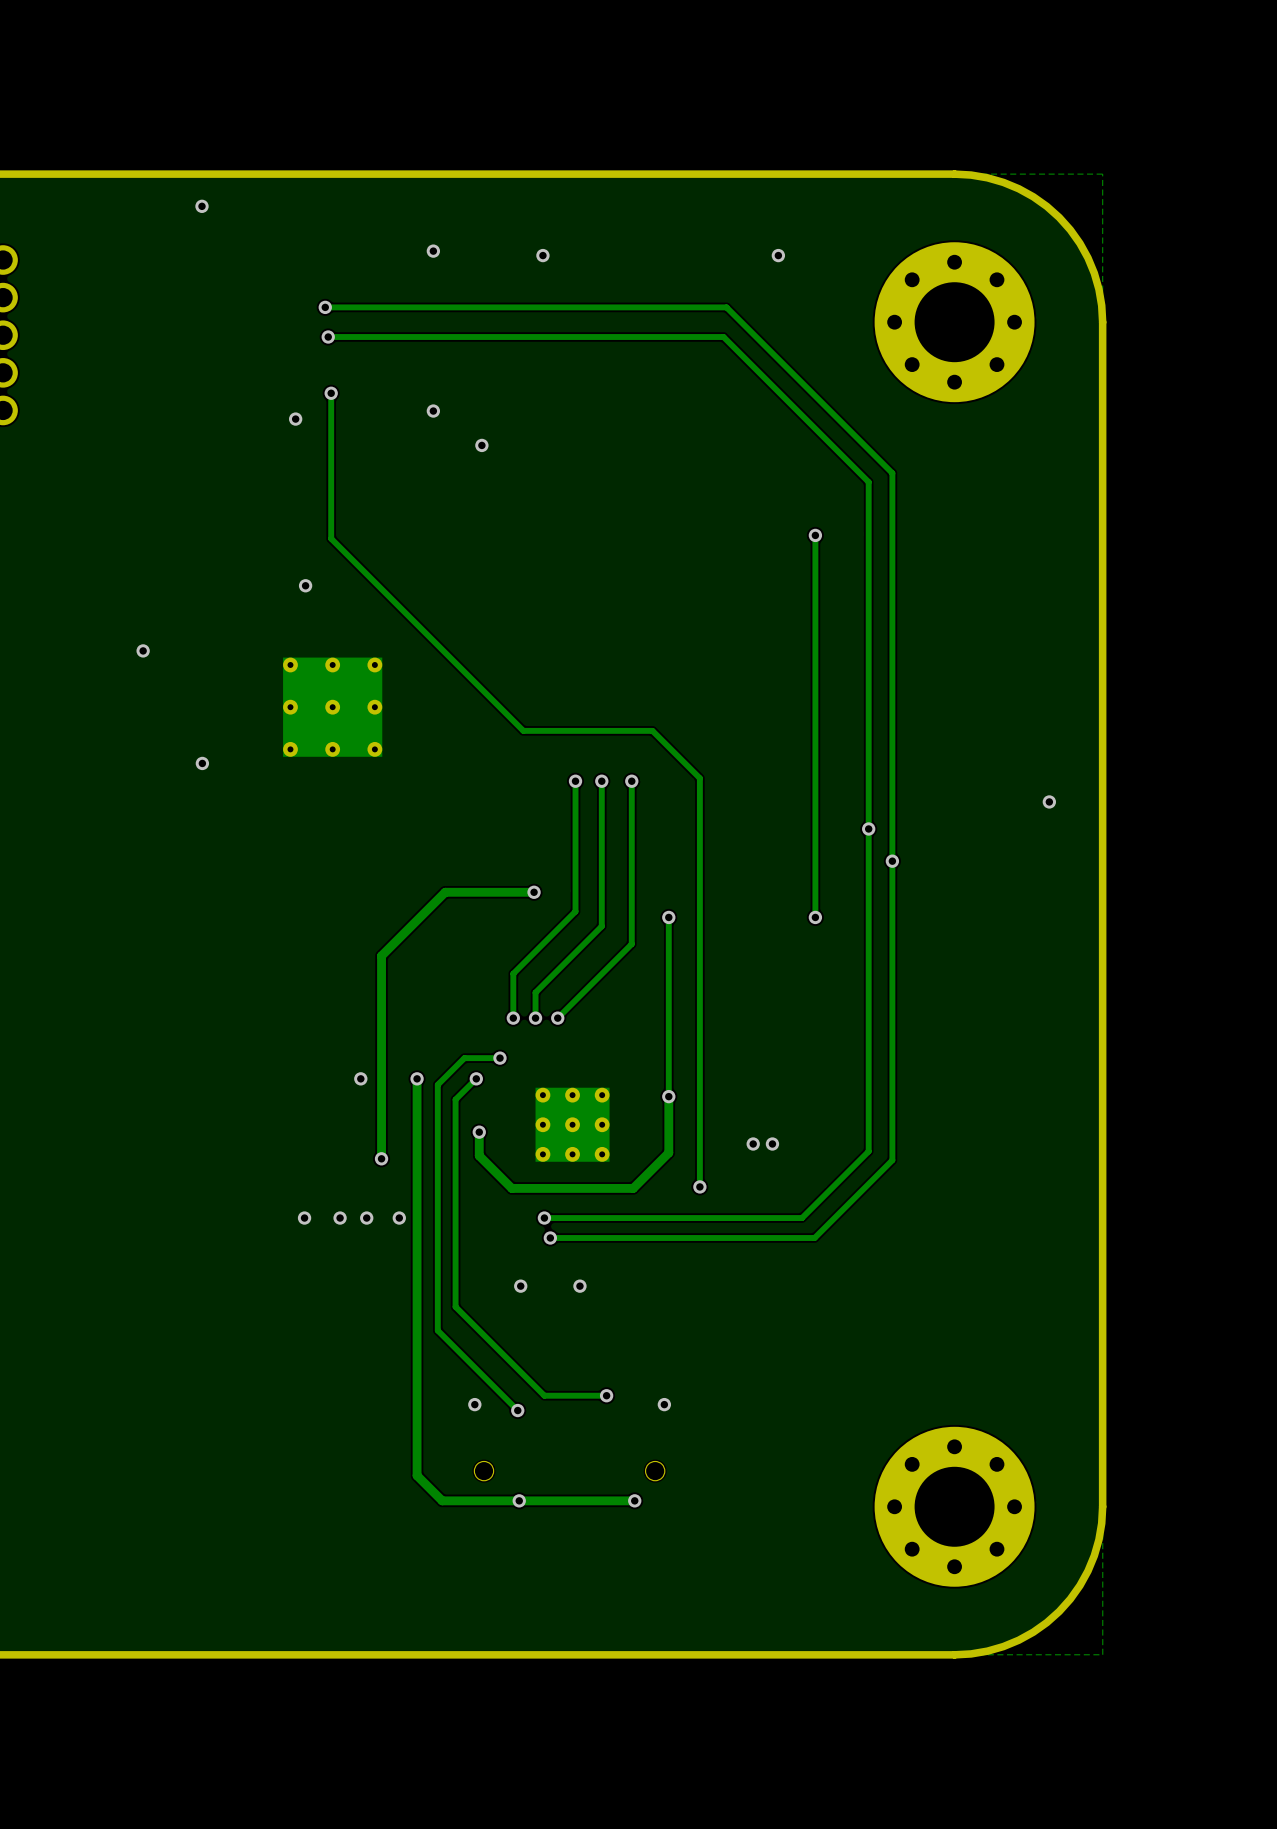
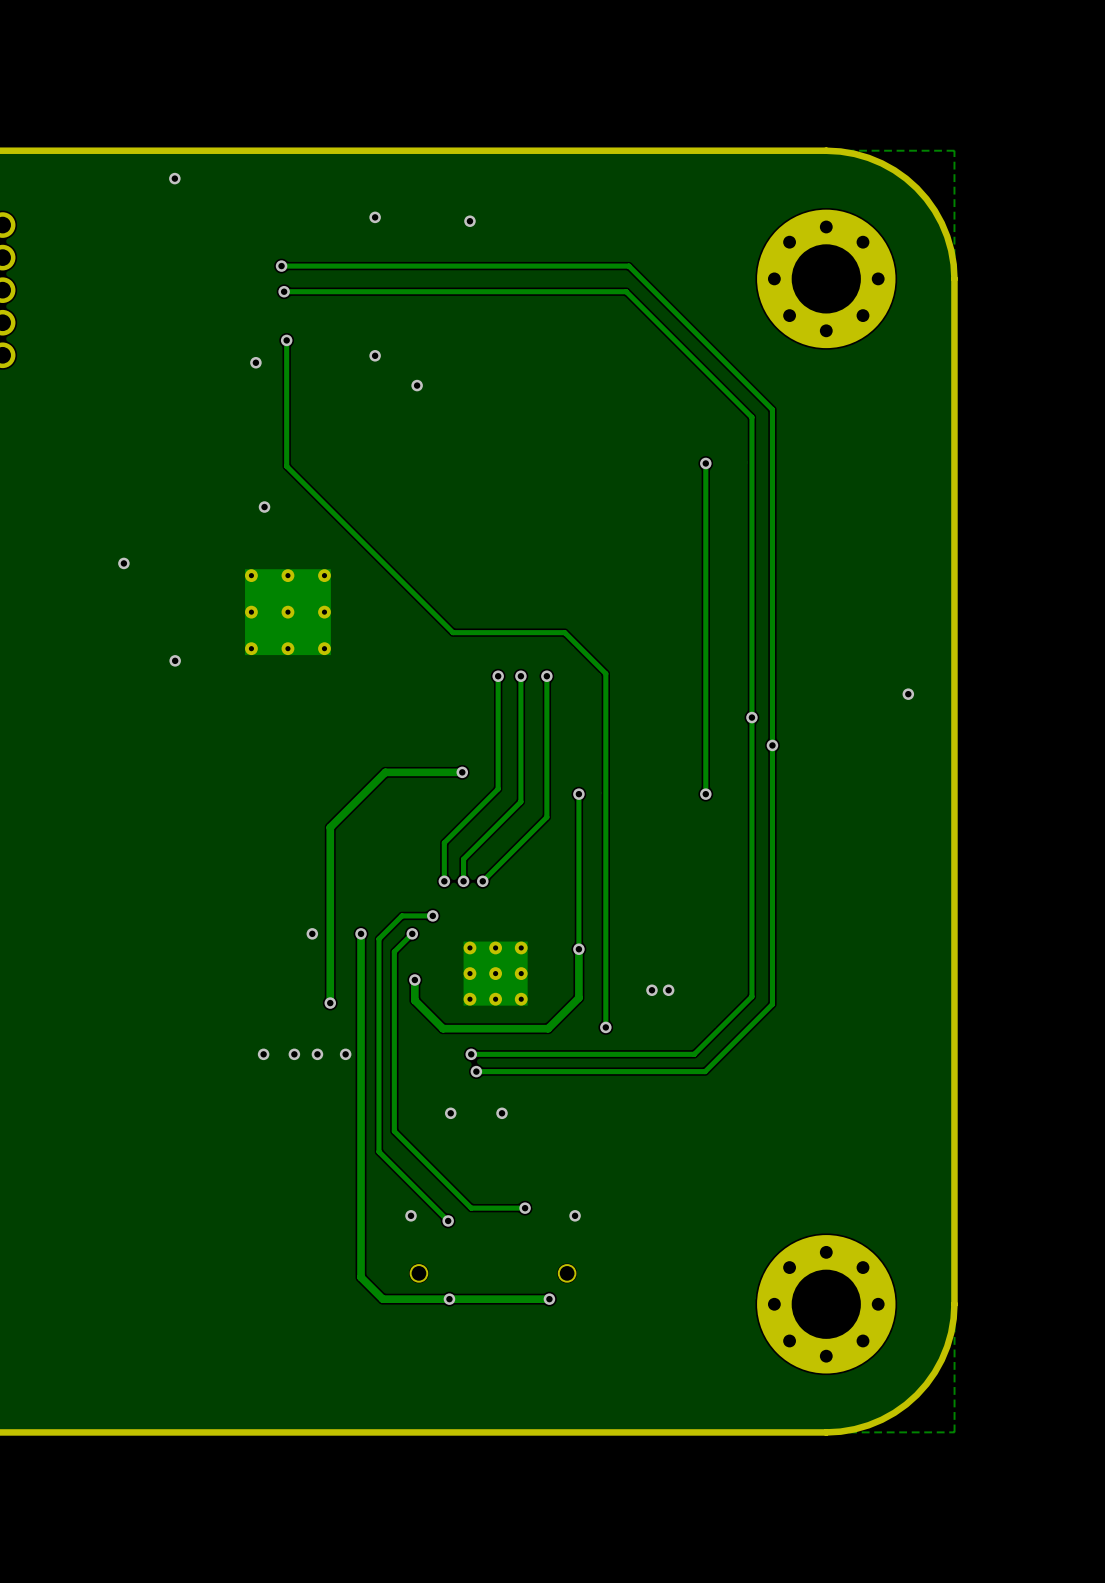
via: (778, 255) -> none

